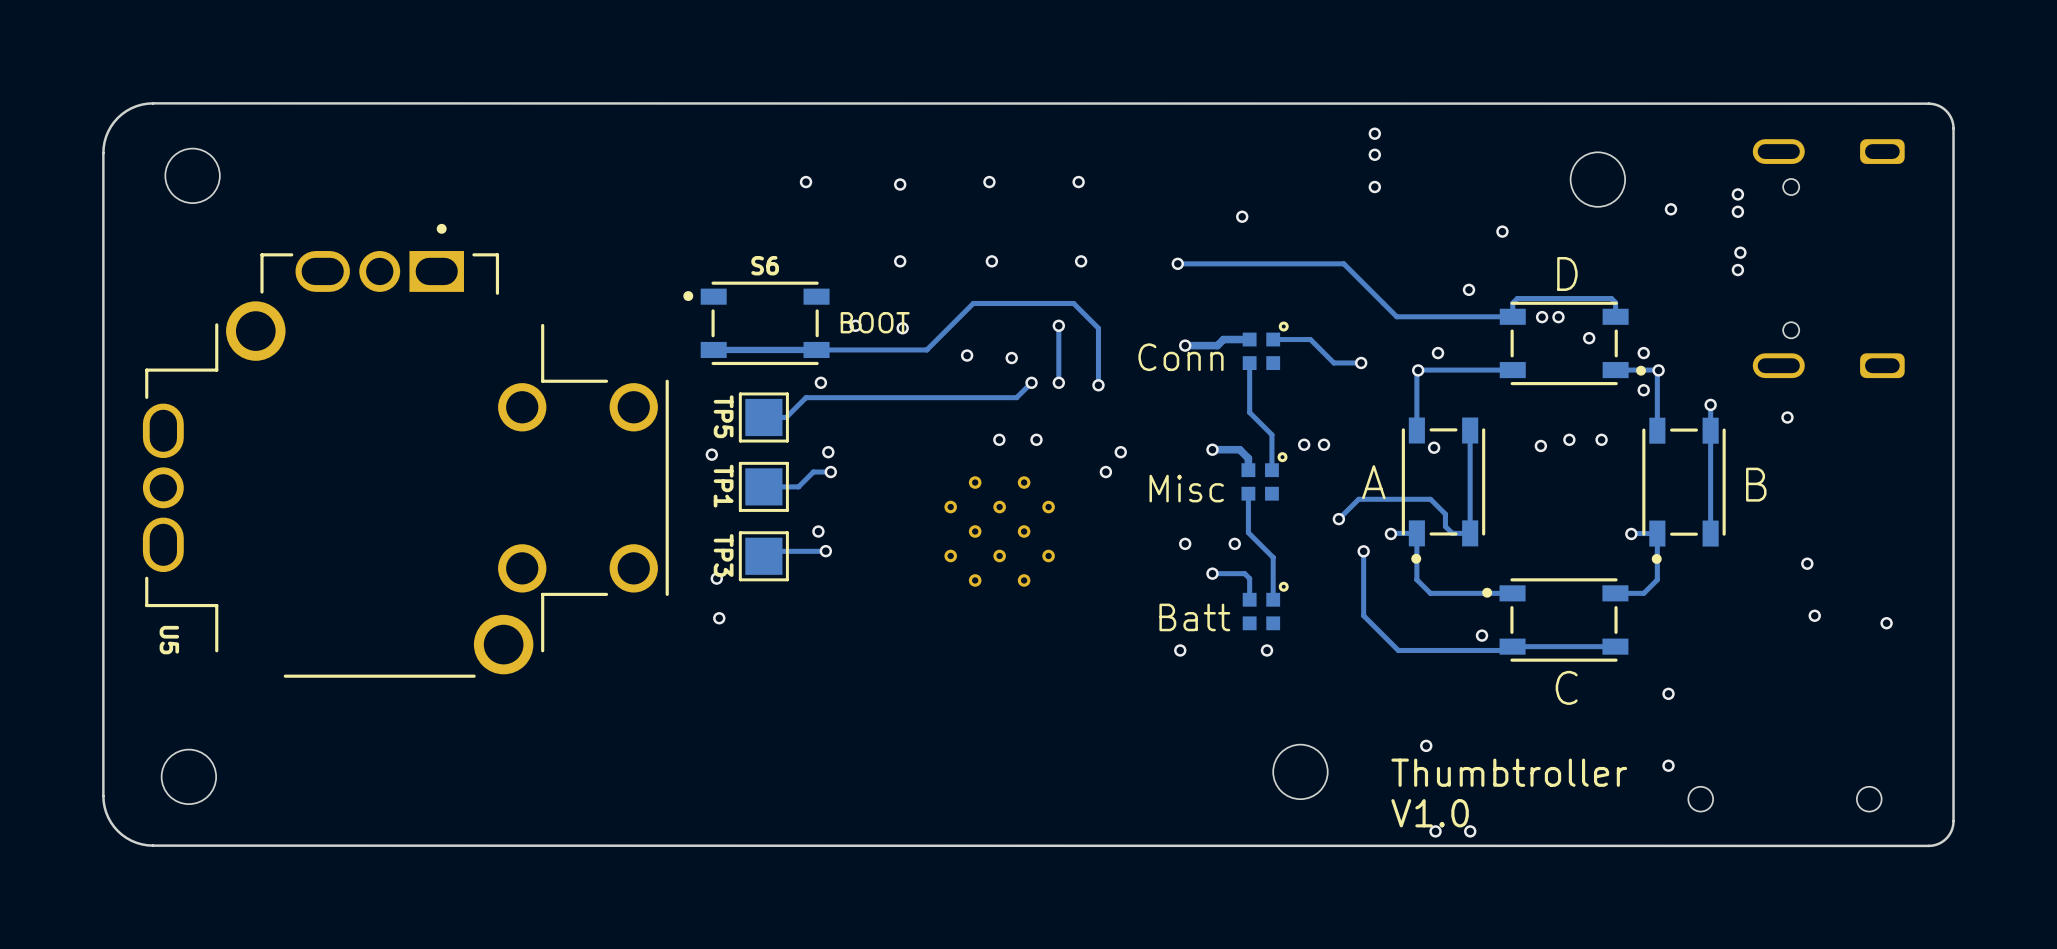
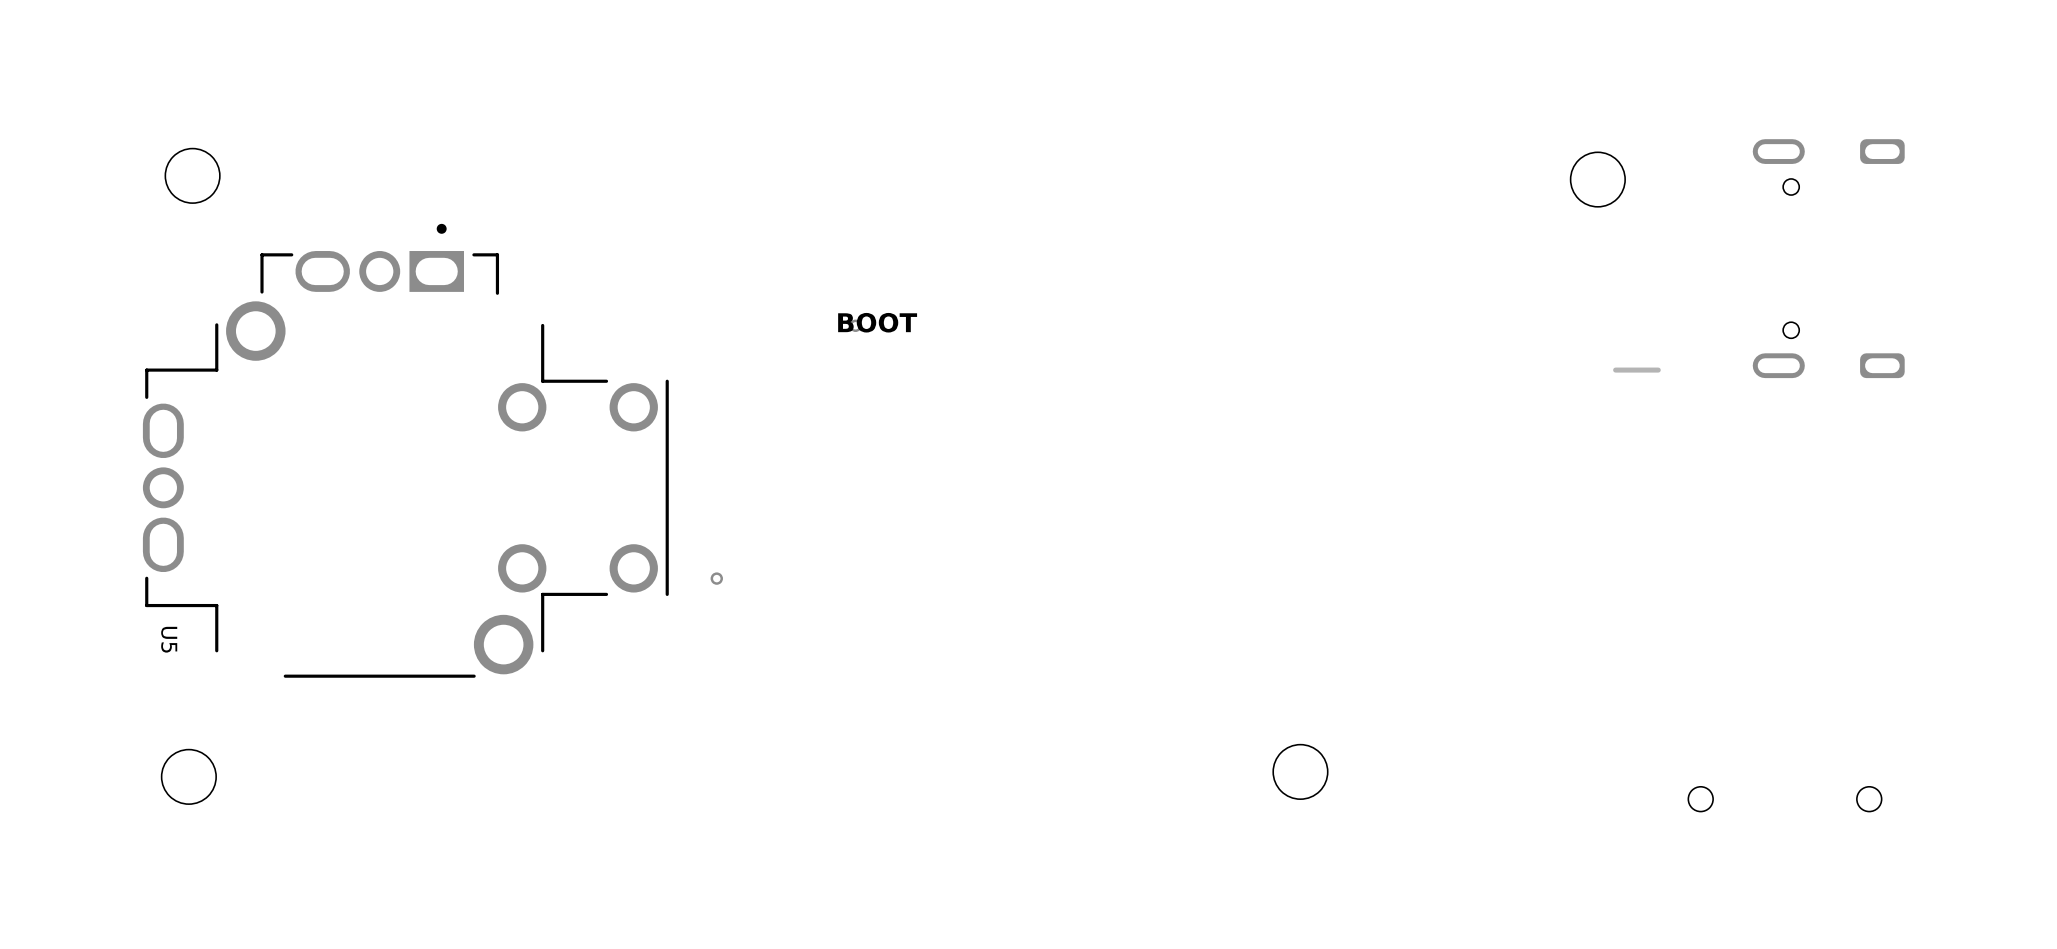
board edge: (152, 103) (1936, 105) (1949, 115) (1953, 128) (1952, 829) (1944, 840) (1928, 845) (152, 845) (136, 842) (122, 834) (110, 822) (106, 812) (103, 796) (103, 152) (108, 131) (117, 117) (131, 108) (152, 103) -> none
via: (1374, 133) -> none
via: (1374, 154) -> none
via: (806, 182) -> none
via: (989, 182) -> none
via: (1078, 182) -> none
via: (900, 184) -> none
via: (1374, 187) -> none
via: (1737, 194) -> none
via: (1670, 209) -> none
via: (1737, 211) -> none
via: (1242, 216) -> none
via: (1502, 231) -> none
via: (1740, 252) -> none
via: (900, 261) -> none
via: (991, 261) -> none
via: (1081, 261) -> none
track: (1177, 263) (1343, 263) (1396, 316) (1512, 316) (1512, 303) (1517, 298) (1611, 298) (1615, 302) (1615, 316) -> none
via: (1177, 263) -> none
via: (1737, 270) -> none
text: D (1567, 273) -> none
via: (1468, 289) -> none
via: (1542, 317) -> none
via: (1558, 317) -> none
S6: (756, 323) -> none
track: (1058, 325) (1058, 382) -> none
via: (1058, 325) -> none
via: (902, 328) -> none
via: (1589, 338) -> none
track: (1249, 339) (1223, 339) (1217, 345) (1185, 345) -> none
track: (1273, 339) (1310, 339) (1333, 362) (1361, 362) -> none
part: (1572, 343) -> none
via: (1185, 345) -> none
part: (1265, 345) -> none
track: (713, 349) (926, 349) (973, 303) (1073, 303) (1098, 328) (1098, 385) -> none
via: (1438, 353) -> none
via: (1643, 353) -> none
via: (967, 355) -> none
text: Conn (1180, 357) -> none
via: (1011, 358) -> none
via: (1361, 362) -> none
track: (1249, 363) (1249, 412) (1271, 434) (1271, 470) -> none
via: (1418, 370) -> none
track: (1512, 370) (1418, 370) (1416, 371) (1416, 430) -> none
track: (1658, 370) (1657, 430) -> none
via: (1658, 370) -> none
via: (820, 382) -> none
track: (1031, 382) (1016, 397) (806, 397) (786, 417) (763, 417) -> none
via: (1031, 382) -> none
via: (1058, 382) -> none
via: (1098, 385) -> none
via: (1643, 390) -> none
track: (1710, 404) (1710, 533) -> none
via: (1710, 404) -> none
TP5: (763, 417) -> none
via: (1787, 417) -> none
track: (1470, 430) (1470, 533) (1452, 533) (1445, 526) (1445, 514) (1430, 499) (1358, 499) (1338, 519) -> none
via: (999, 439) -> none
via: (1036, 439) -> none
via: (1569, 439) -> none
via: (1601, 439) -> none
via: (1304, 444) -> none
via: (1324, 444) -> none
via: (1540, 446) -> none
via: (1434, 447) -> none
track: (1212, 449) (1239, 449) (1248, 458) (1248, 470) -> none
via: (1212, 449) -> none
via: (828, 452) -> none
via: (1120, 452) -> none
via: (711, 454) -> none
track: (830, 472) (813, 472) (798, 486) (763, 486) -> none
via: (830, 472) -> none
via: (1105, 472) -> none
part: (1264, 476) -> none
text: A (1373, 482) -> none
text: B (1756, 484) -> none
TP1: (763, 486) -> none
text: Misc (1186, 488) -> none
part: (1443, 490) -> none
part: (1683, 490) -> none
track: (1248, 493) (1248, 532) (1273, 557) (1273, 599) -> none
via: (1338, 519) -> none
via: (818, 531) -> none
part: (999, 531) -> none
track: (1390, 533) (1416, 533) (1416, 579) (1430, 593) (1512, 593) -> none
via: (1390, 533) -> none
track: (1631, 533) (1657, 533) (1657, 579) (1643, 593) (1615, 593) -> none
via: (1631, 533) -> none
via: (1185, 543) -> none
via: (1234, 543) -> none
track: (825, 551) (768, 551) (763, 556) -> none
via: (825, 551) -> none
track: (1363, 551) (1363, 615) (1398, 650) (1508, 650) (1512, 646) (1615, 646) -> none
via: (1363, 551) -> none
TP3: (763, 556) -> none
via: (1807, 563) -> none
track: (1212, 573) (1244, 573) (1249, 578) (1249, 599) -> none
via: (1212, 573) -> none
part: (1265, 606) -> none
via: (1814, 615) -> none
text: Batt (1194, 617) -> none
via: (719, 618) -> none
part: (1555, 619) -> none
via: (1886, 623) -> none
via: (1482, 635) -> none
via: (1180, 650) -> none
via: (1267, 650) -> none
text: C (1566, 687) -> none
via: (1668, 693) -> none
via: (1426, 745) -> none
via: (1668, 765) -> none
text: Thumbtroller (1509, 772) -> none
text: V1.0 (1430, 813) -> none
via: (1435, 831) -> none
via: (1470, 831) -> none

